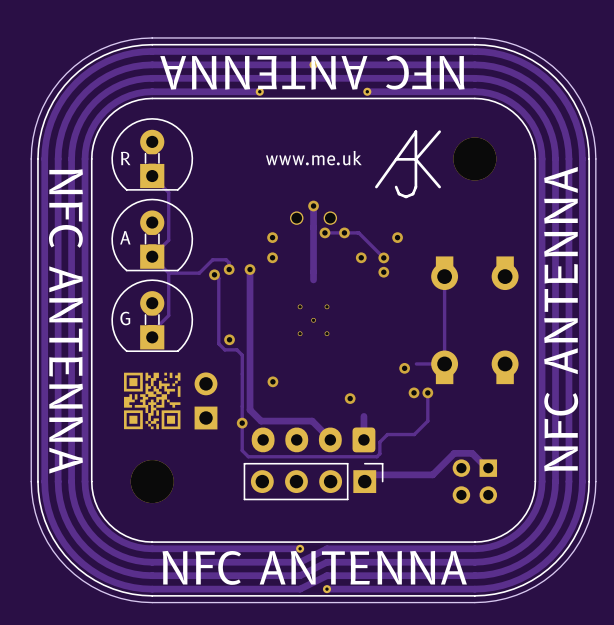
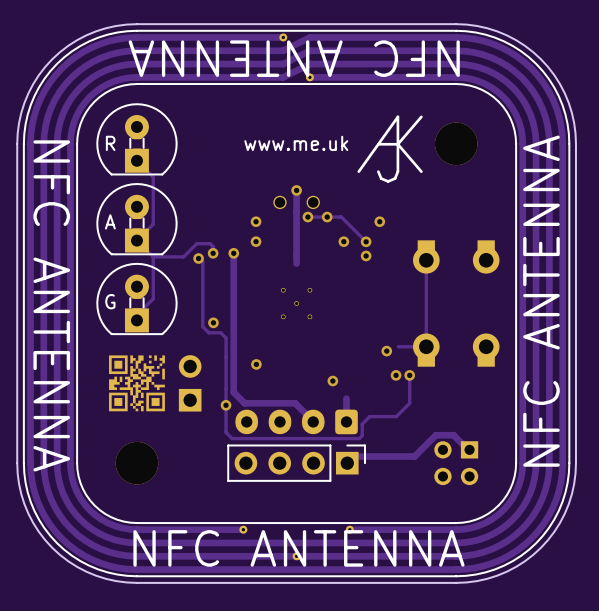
part rotation: 0° (313, 320) -> 180° (296, 303)

